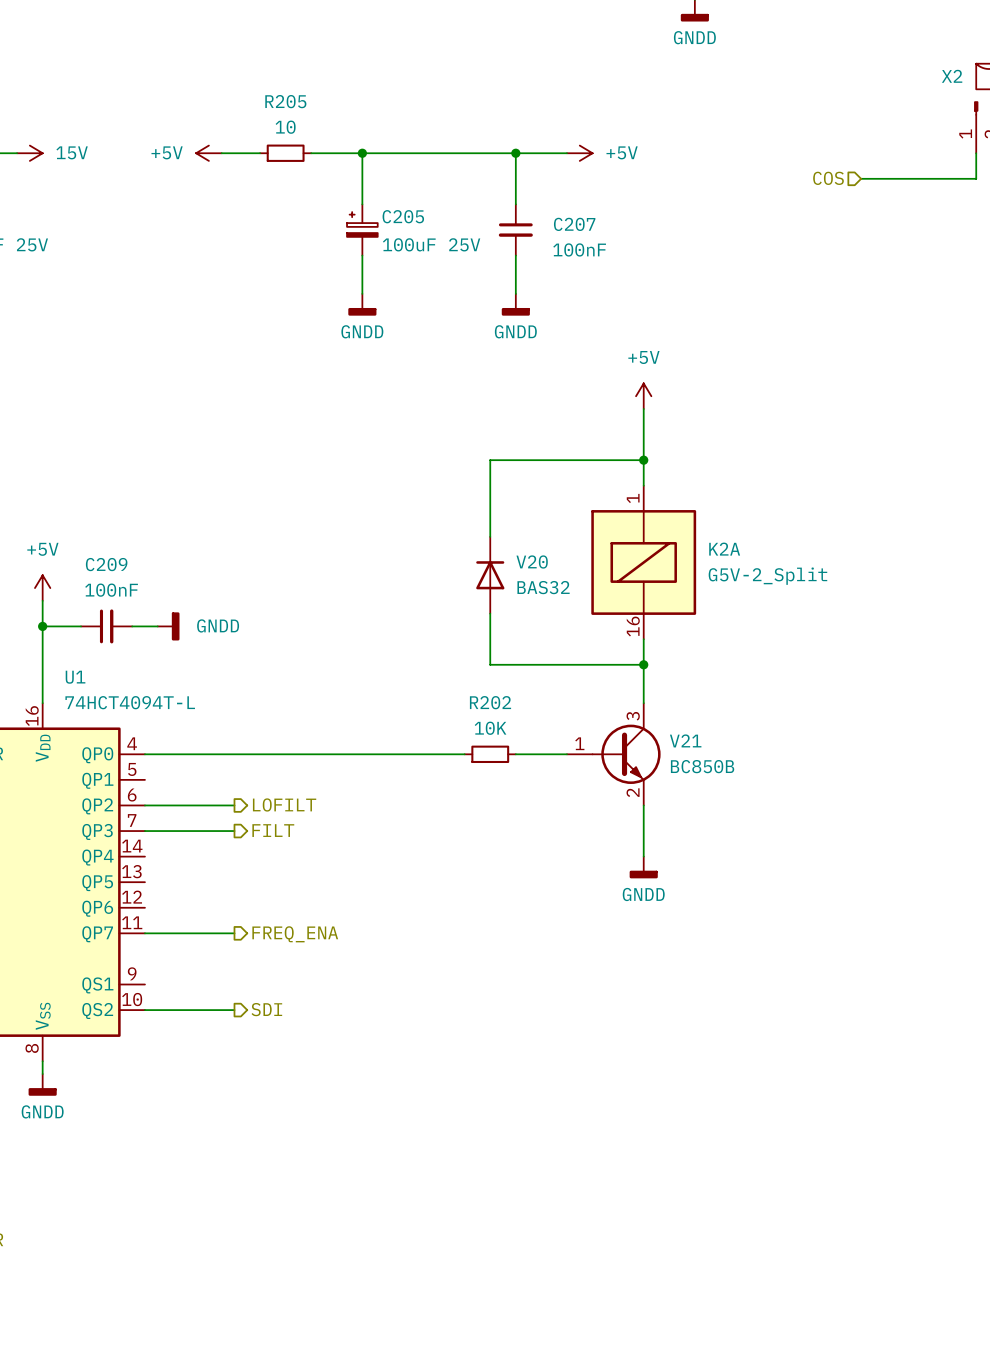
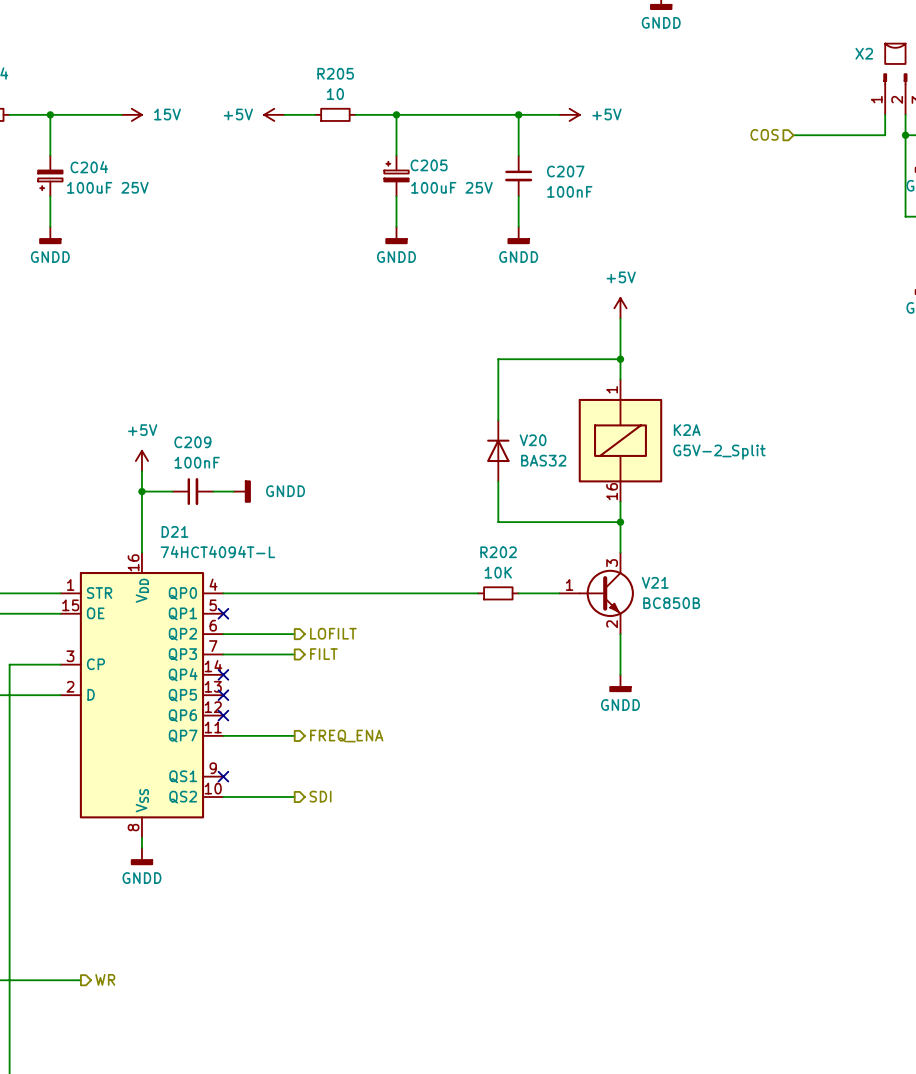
U1 name: U1 (75, 677) -> D21 (174, 531)
no-connect mark: none -> (223, 613)
no-connect mark: none -> (223, 674)
no-connect mark: none -> (223, 695)
no-connect mark: none -> (223, 715)
no-connect mark: none -> (223, 776)

